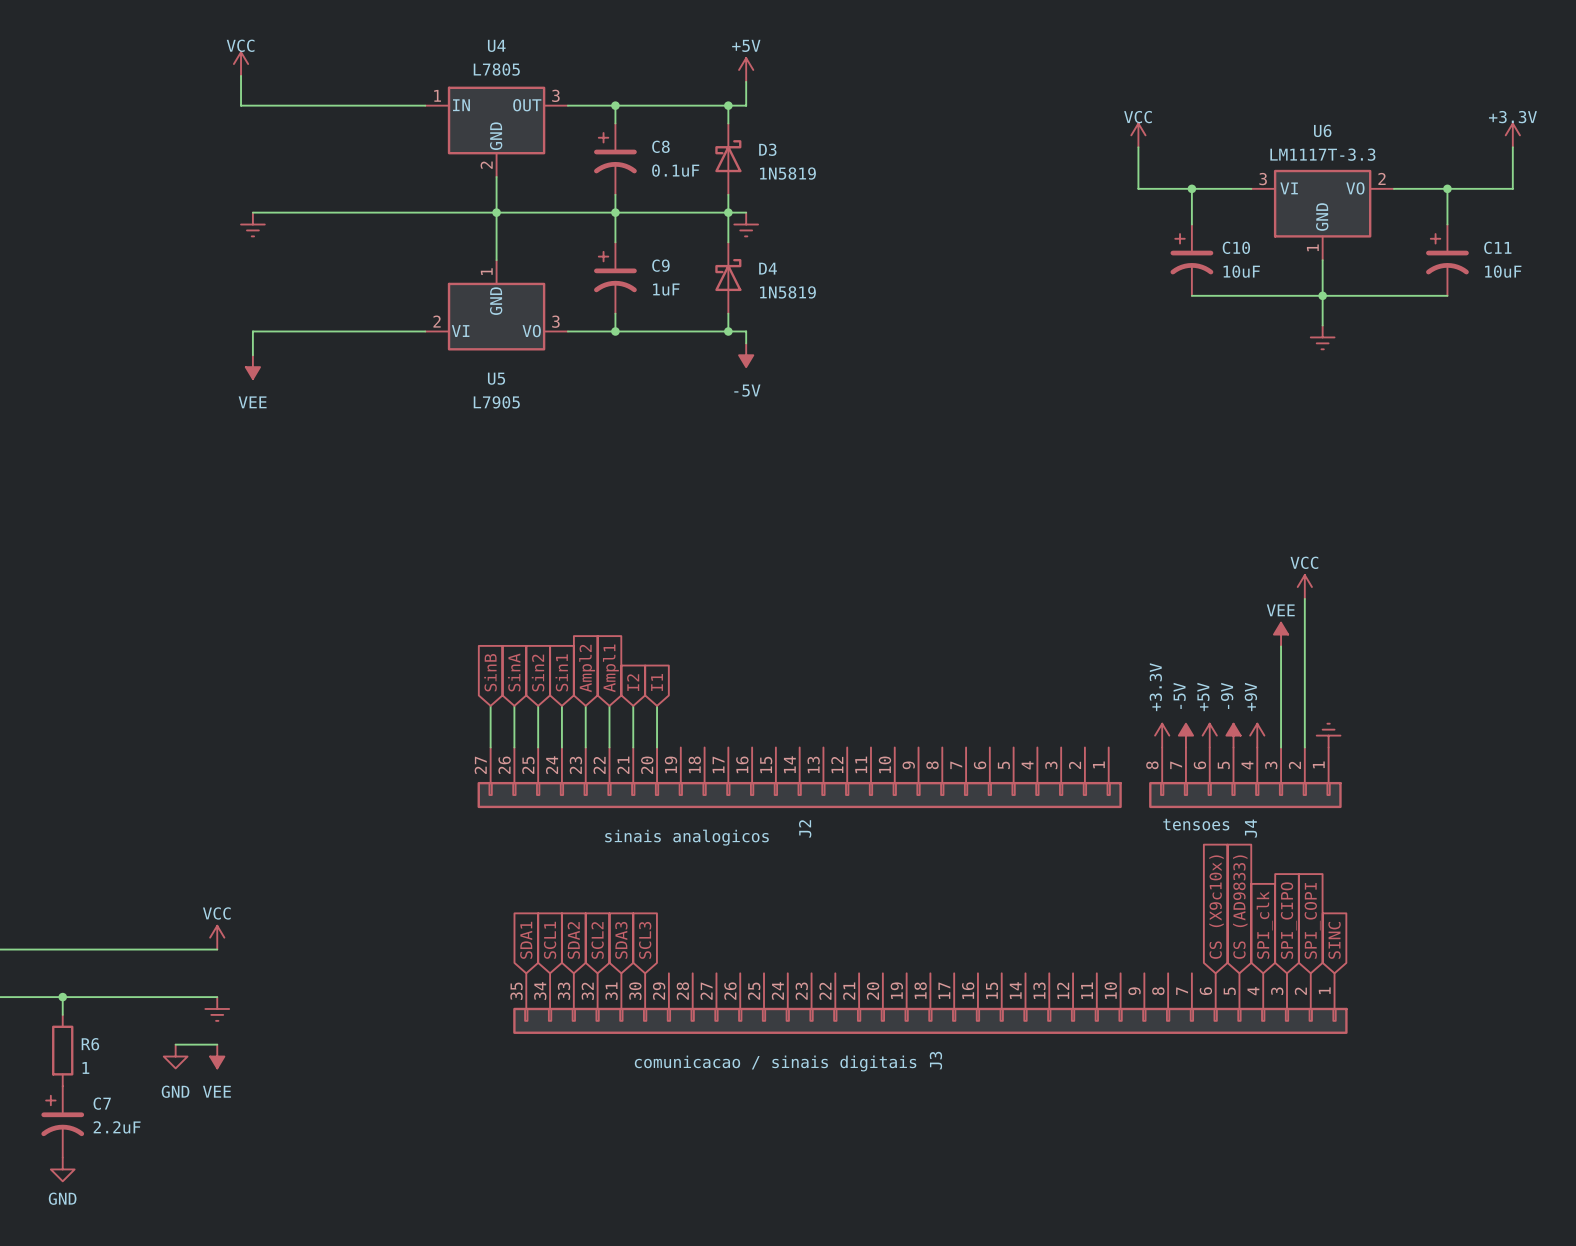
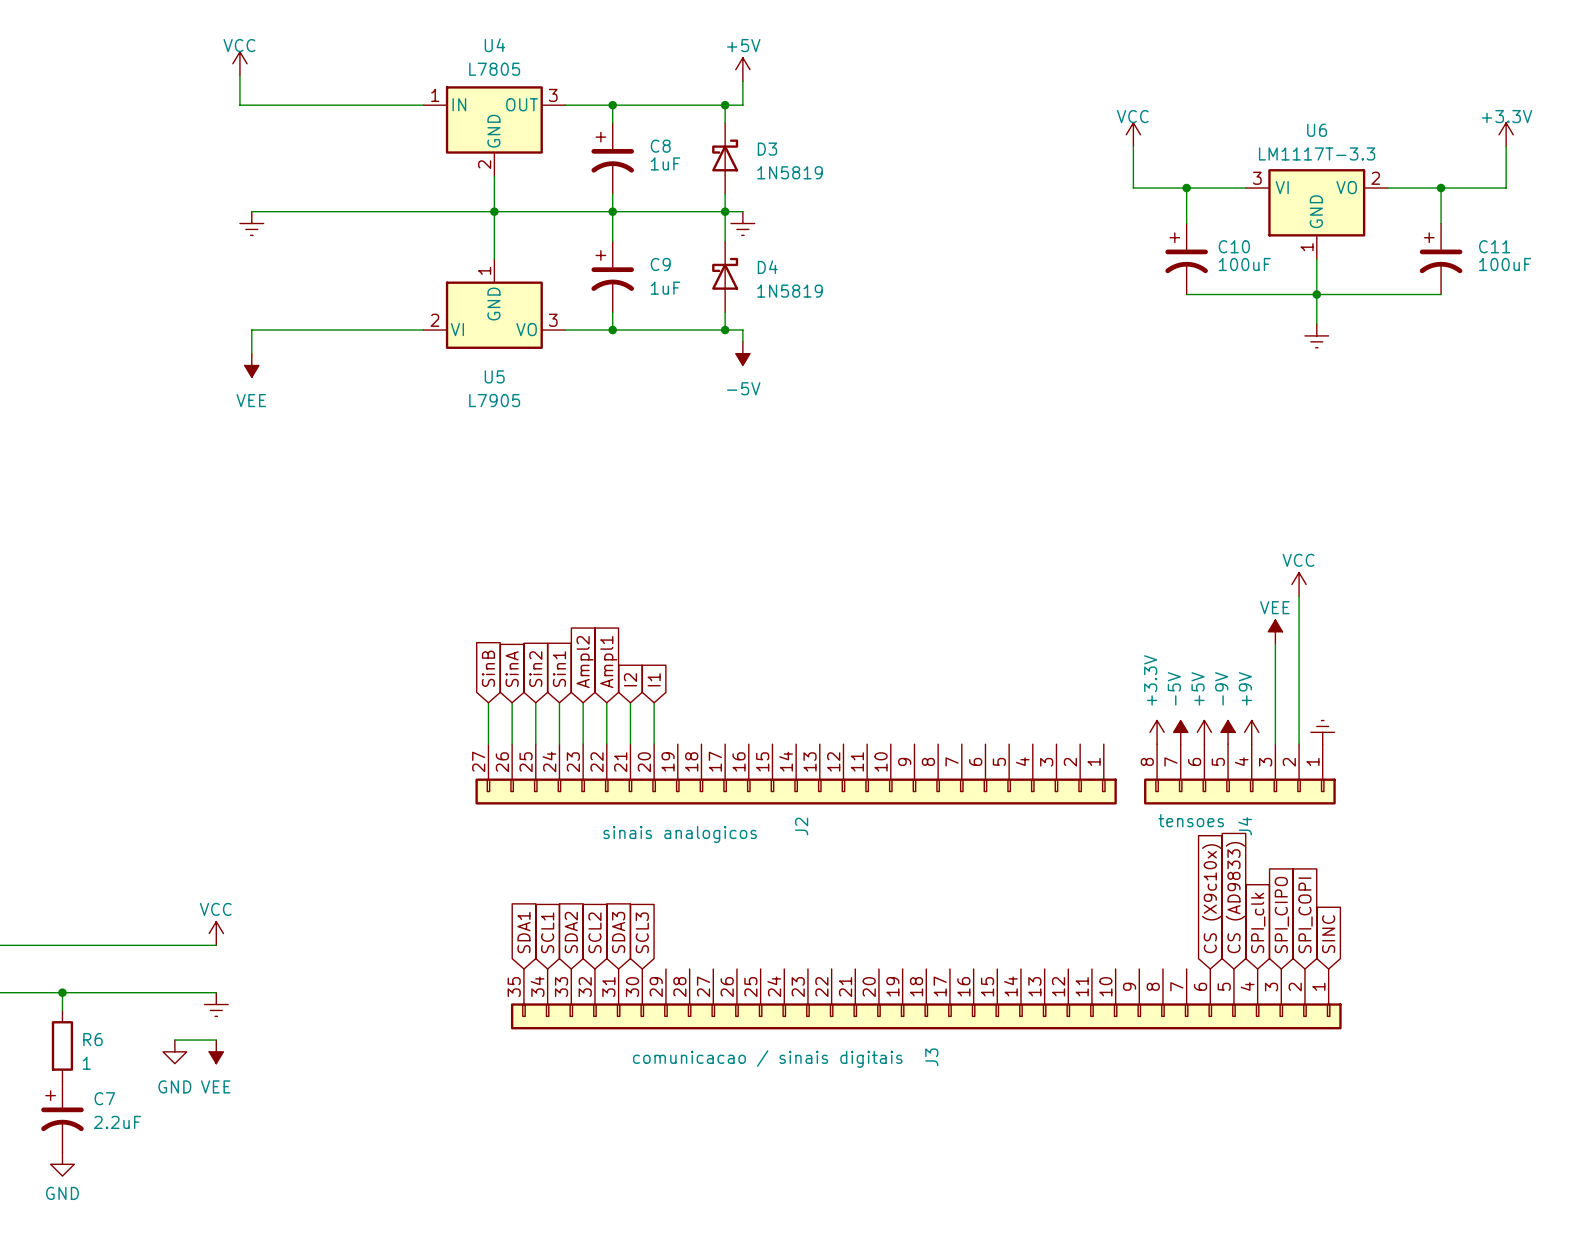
C8 value: 0.1uF (675, 170) -> 1uF (665, 163)
C10 value: 10uF (1241, 271) -> 100uF (1244, 264)
C11 value: 10uF (1503, 271) -> 100uF (1505, 264)

